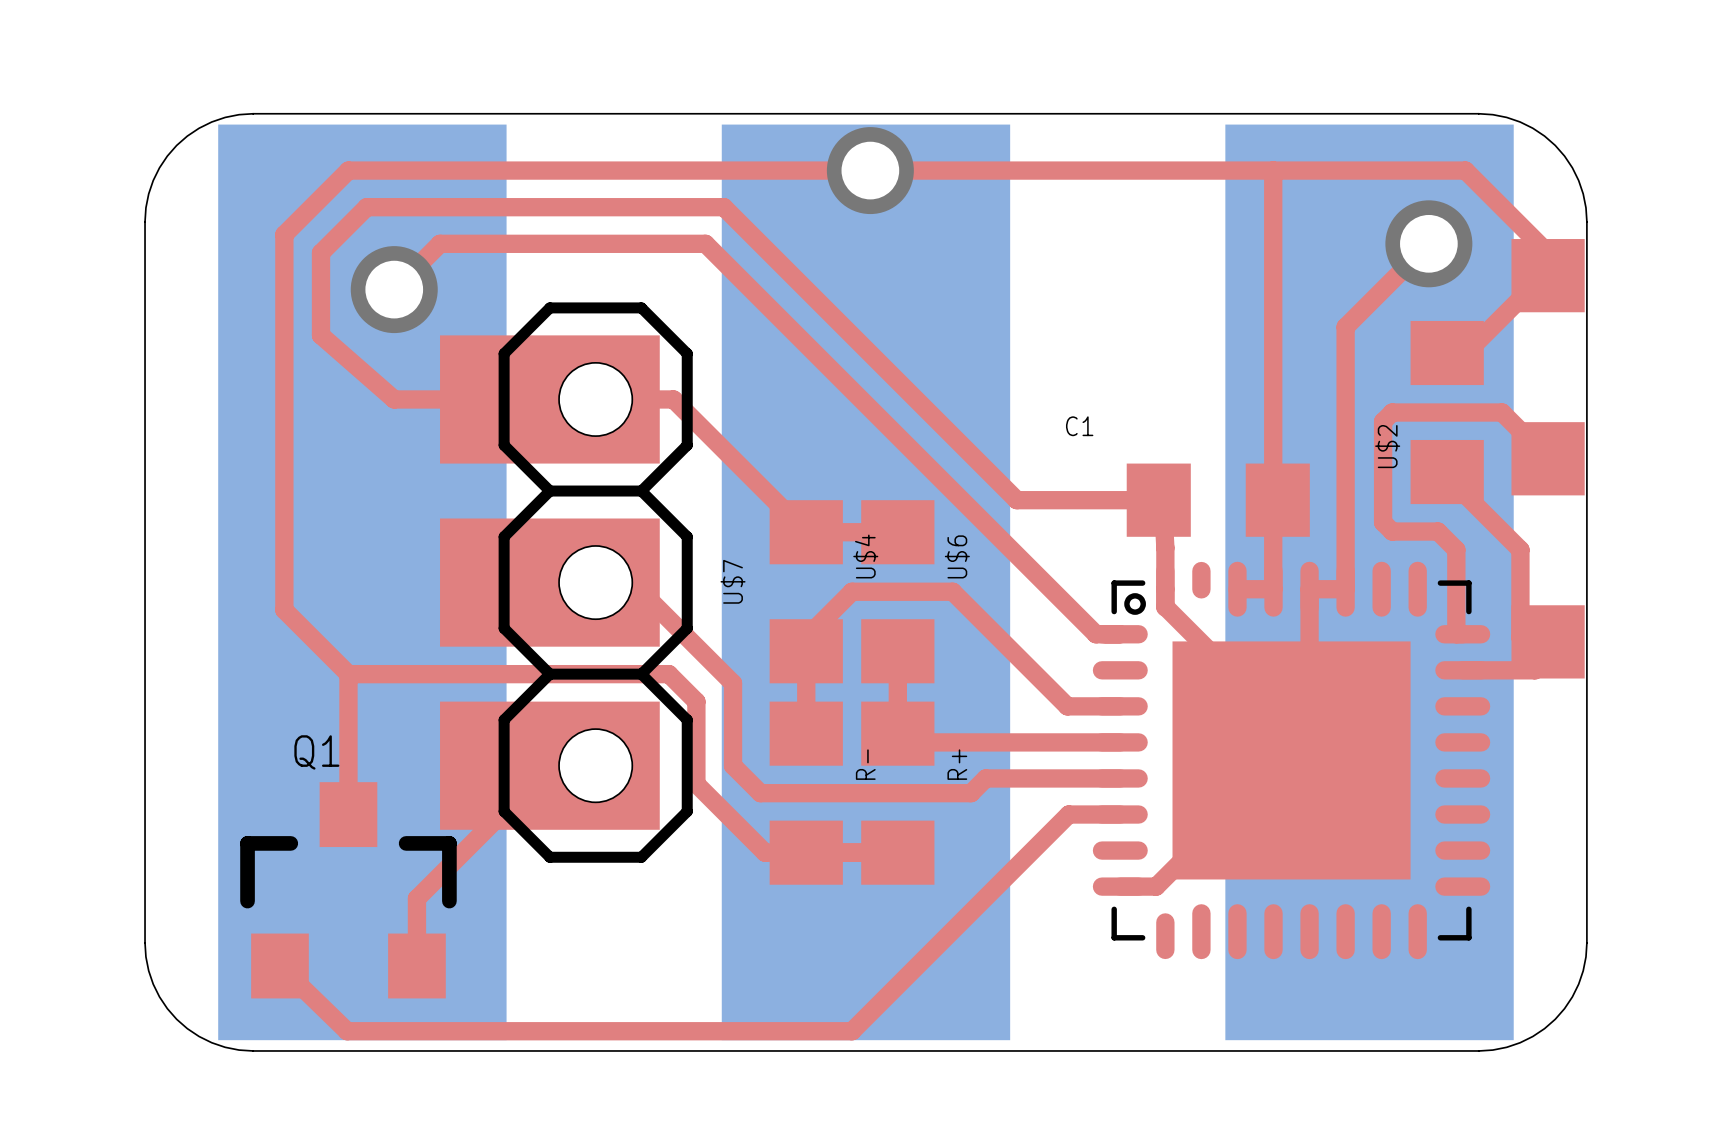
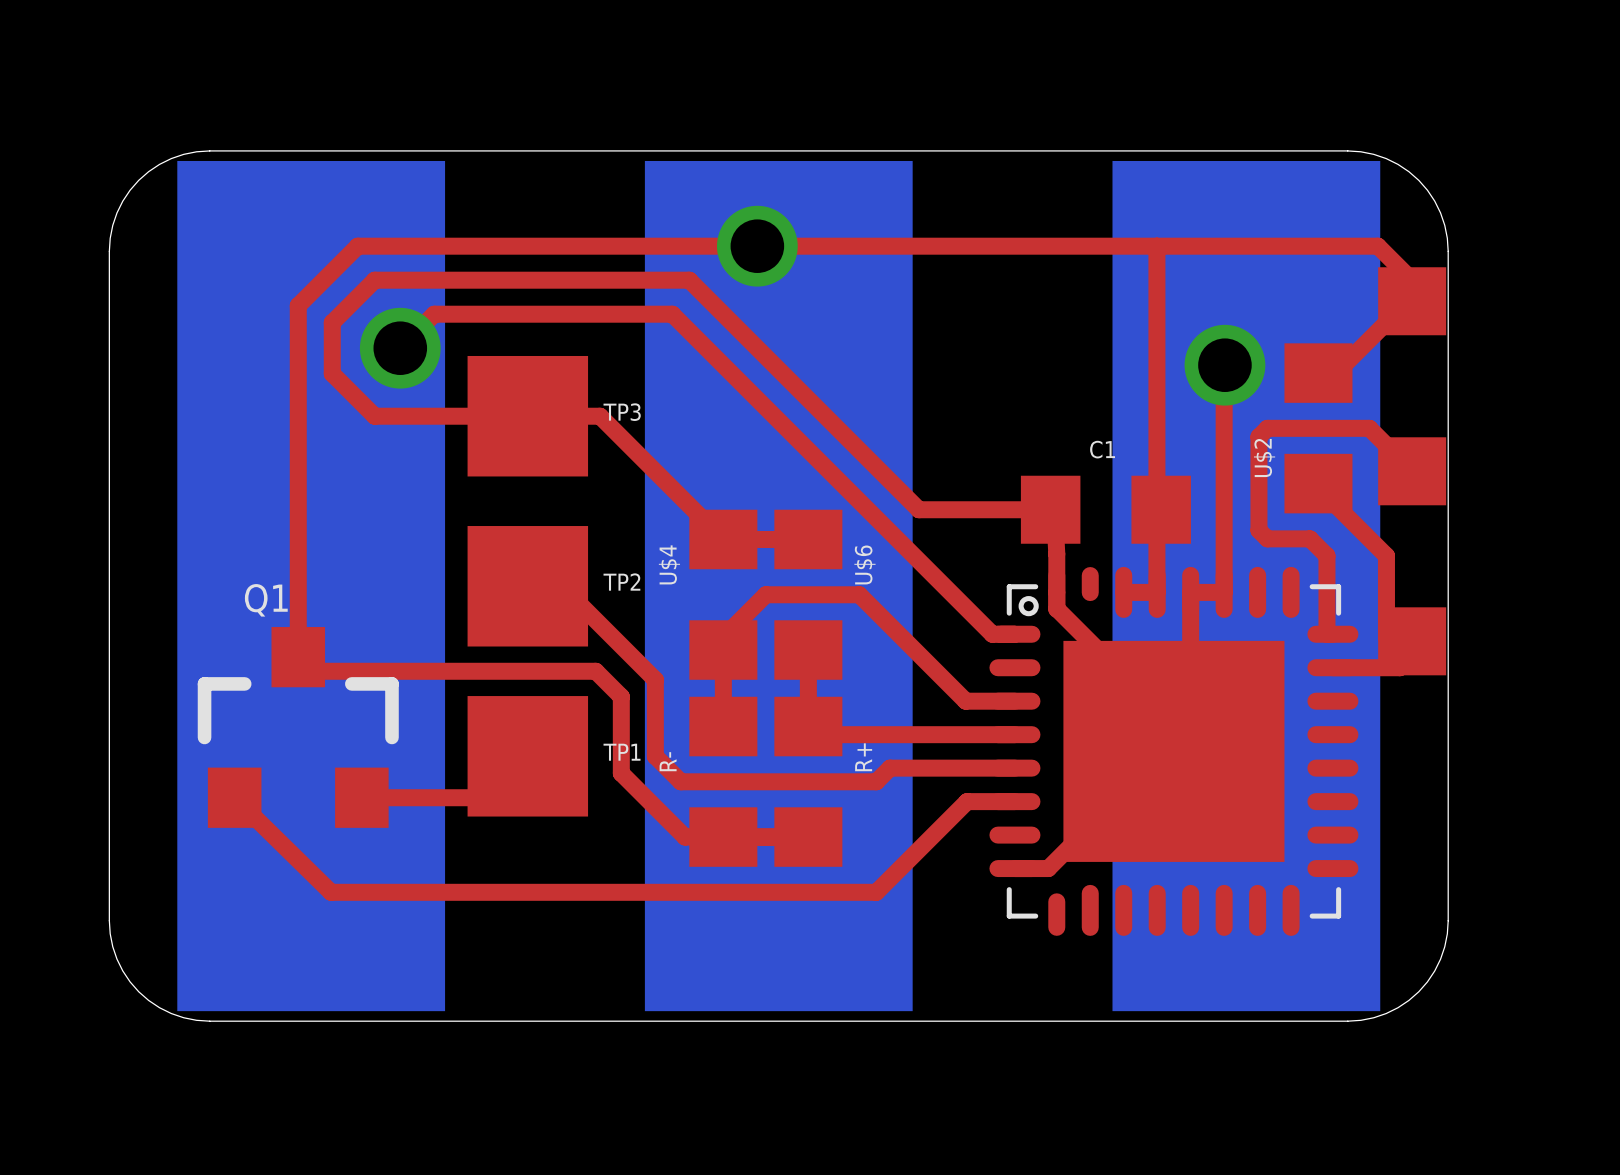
via position: (870, 170) -> (757, 246)
top track: (1273, 170) (1273, 216) -> none
top track: (1511, 216) (1465, 170) (348, 170) (284, 234) (284, 610) (348, 674) (348, 814) -> (1377, 246) (357, 246) (298, 305) (298, 671)
top track: (1428, 243) (1345, 327) (1345, 345) -> none
via position: (1428, 243) -> (1224, 365)
top track: (430, 252) (440, 243) (705, 243) (751, 289) -> (374, 280) (689, 280)
top track: (769, 252) (723, 207) (366, 207) (321, 252) (321, 335) (394, 399) (430, 399) -> (340, 314) (332, 322) (332, 373) (374, 416)
via position: (394, 289) -> (400, 348)
top track: none -> (672, 314) (434, 314) (400, 348)
TP3: none -> (527, 416)
C1 name position: C1 (1079, 426) -> C1 (1102, 449)
U$4 name position: U$4 (865, 556) -> U$4 (669, 564)
U$7: (566, 582) -> none
TP2: none -> (527, 586)
R- name position: R- (865, 764) -> R- (668, 761)
top track: (549, 765) (416, 898) (416, 965) -> none
top track: none -> (527, 756) (486, 797) (361, 797)
TP1: none -> (527, 756)
Q1 position: (348, 890) -> (298, 727)
top track: (971, 912) (852, 1031) (347, 1031) (279, 965) -> (876, 892) (331, 892) (234, 797)

